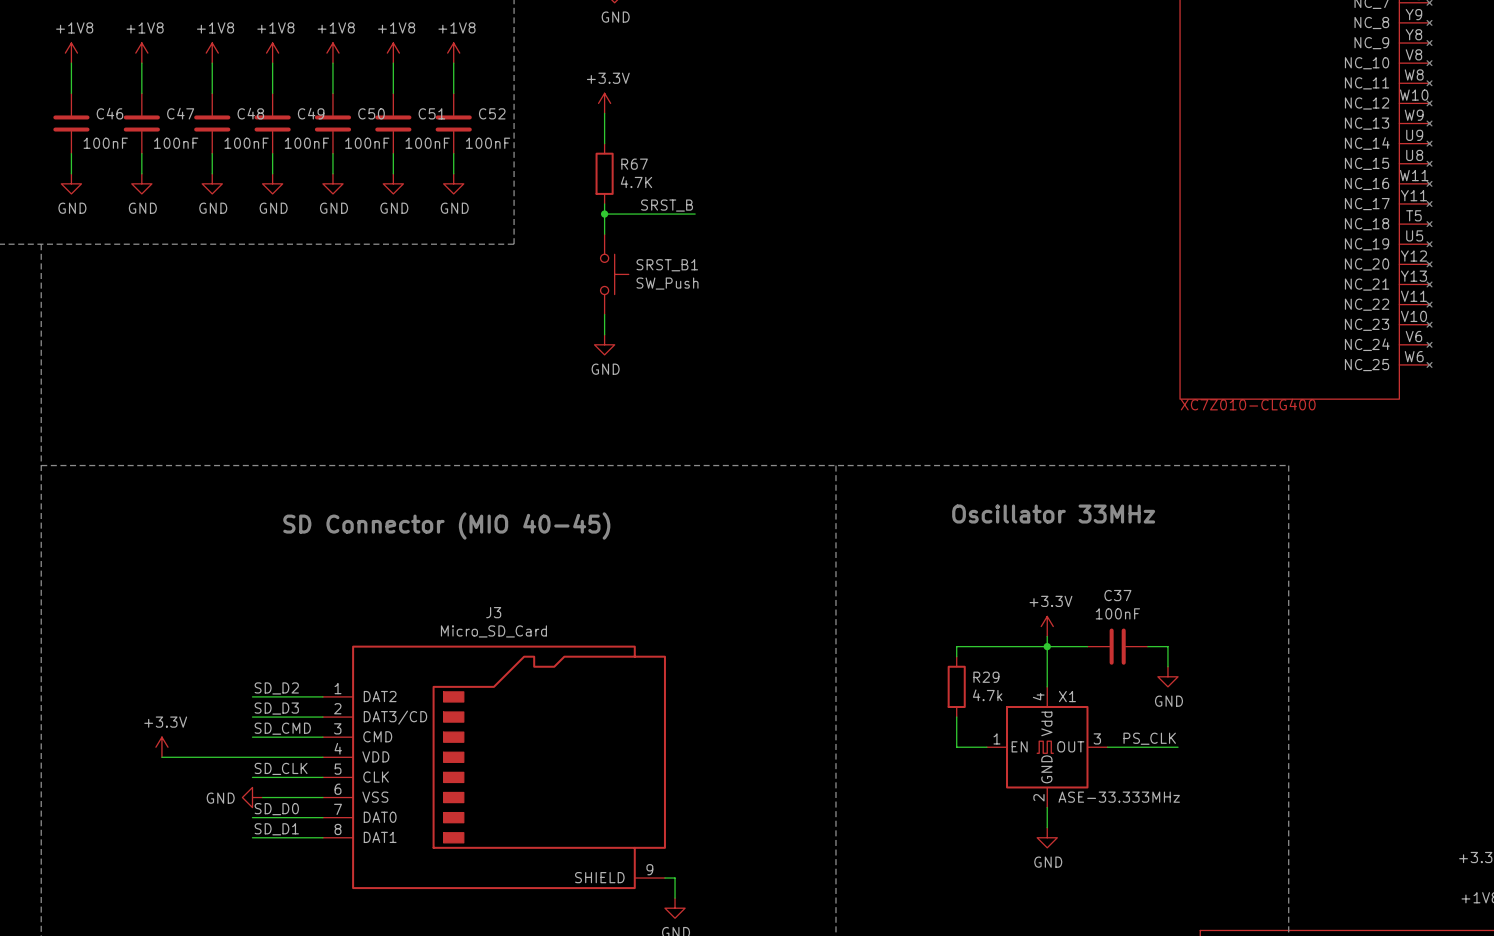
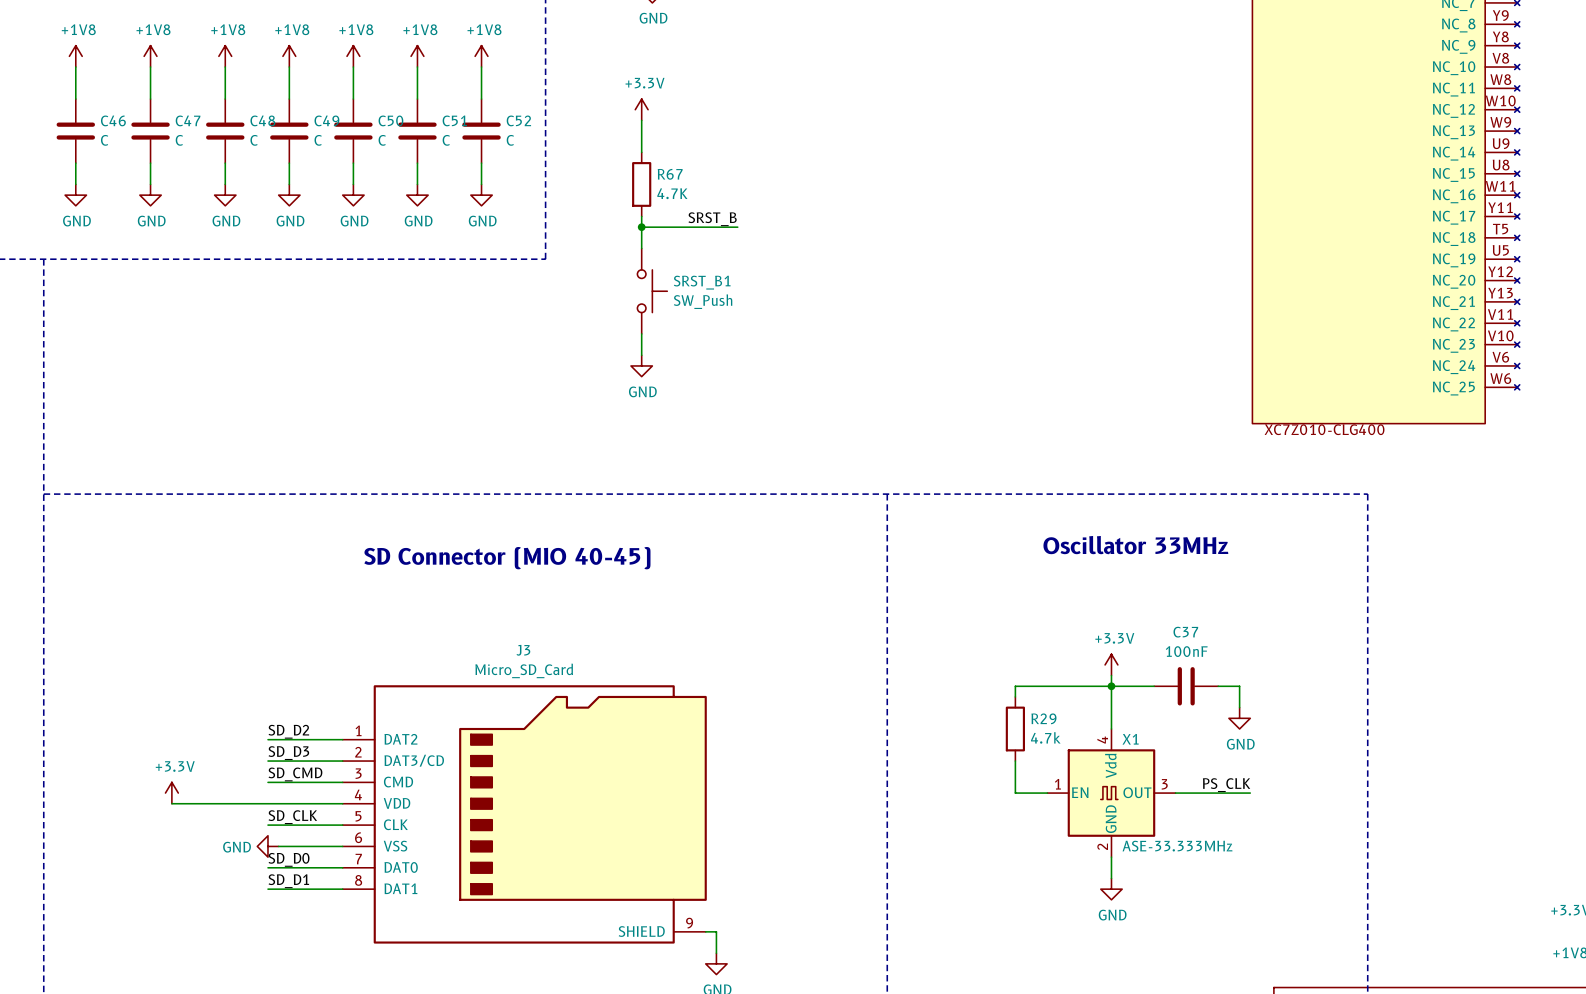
C46 value: 100nF (105, 143) -> C (104, 140)
C47 value: 100nF (176, 143) -> C (179, 140)
C48 value: 100nF (246, 143) -> C (254, 140)
C49 value: 100nF (306, 143) -> C (318, 140)
C50 value: 100nF (367, 143) -> C (382, 140)
C51 value: 100nF (427, 143) -> C (446, 140)
C52 value: 100nF (488, 143) -> C (510, 140)

